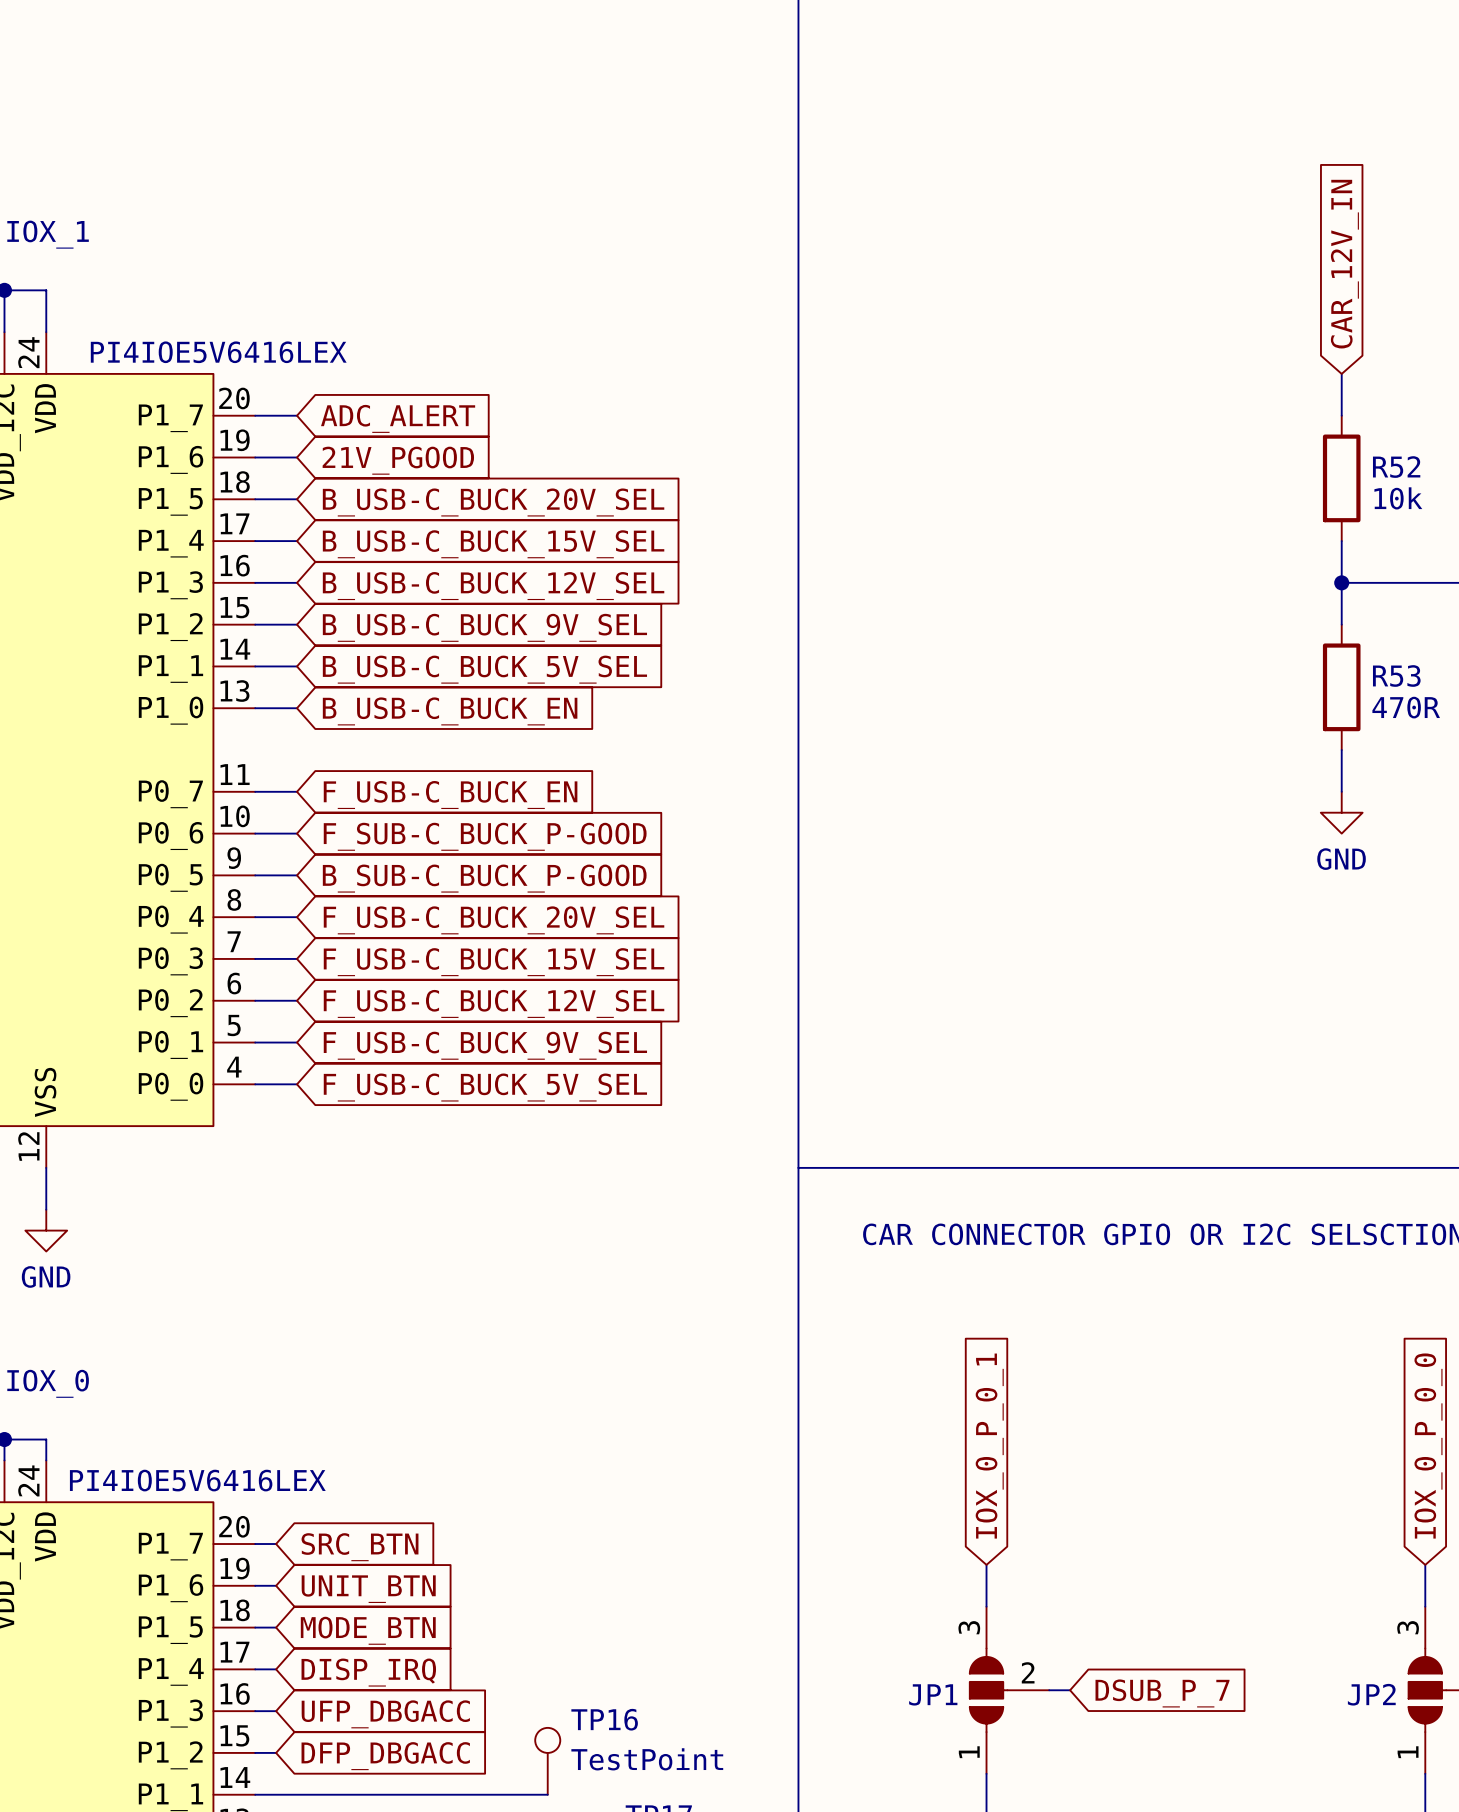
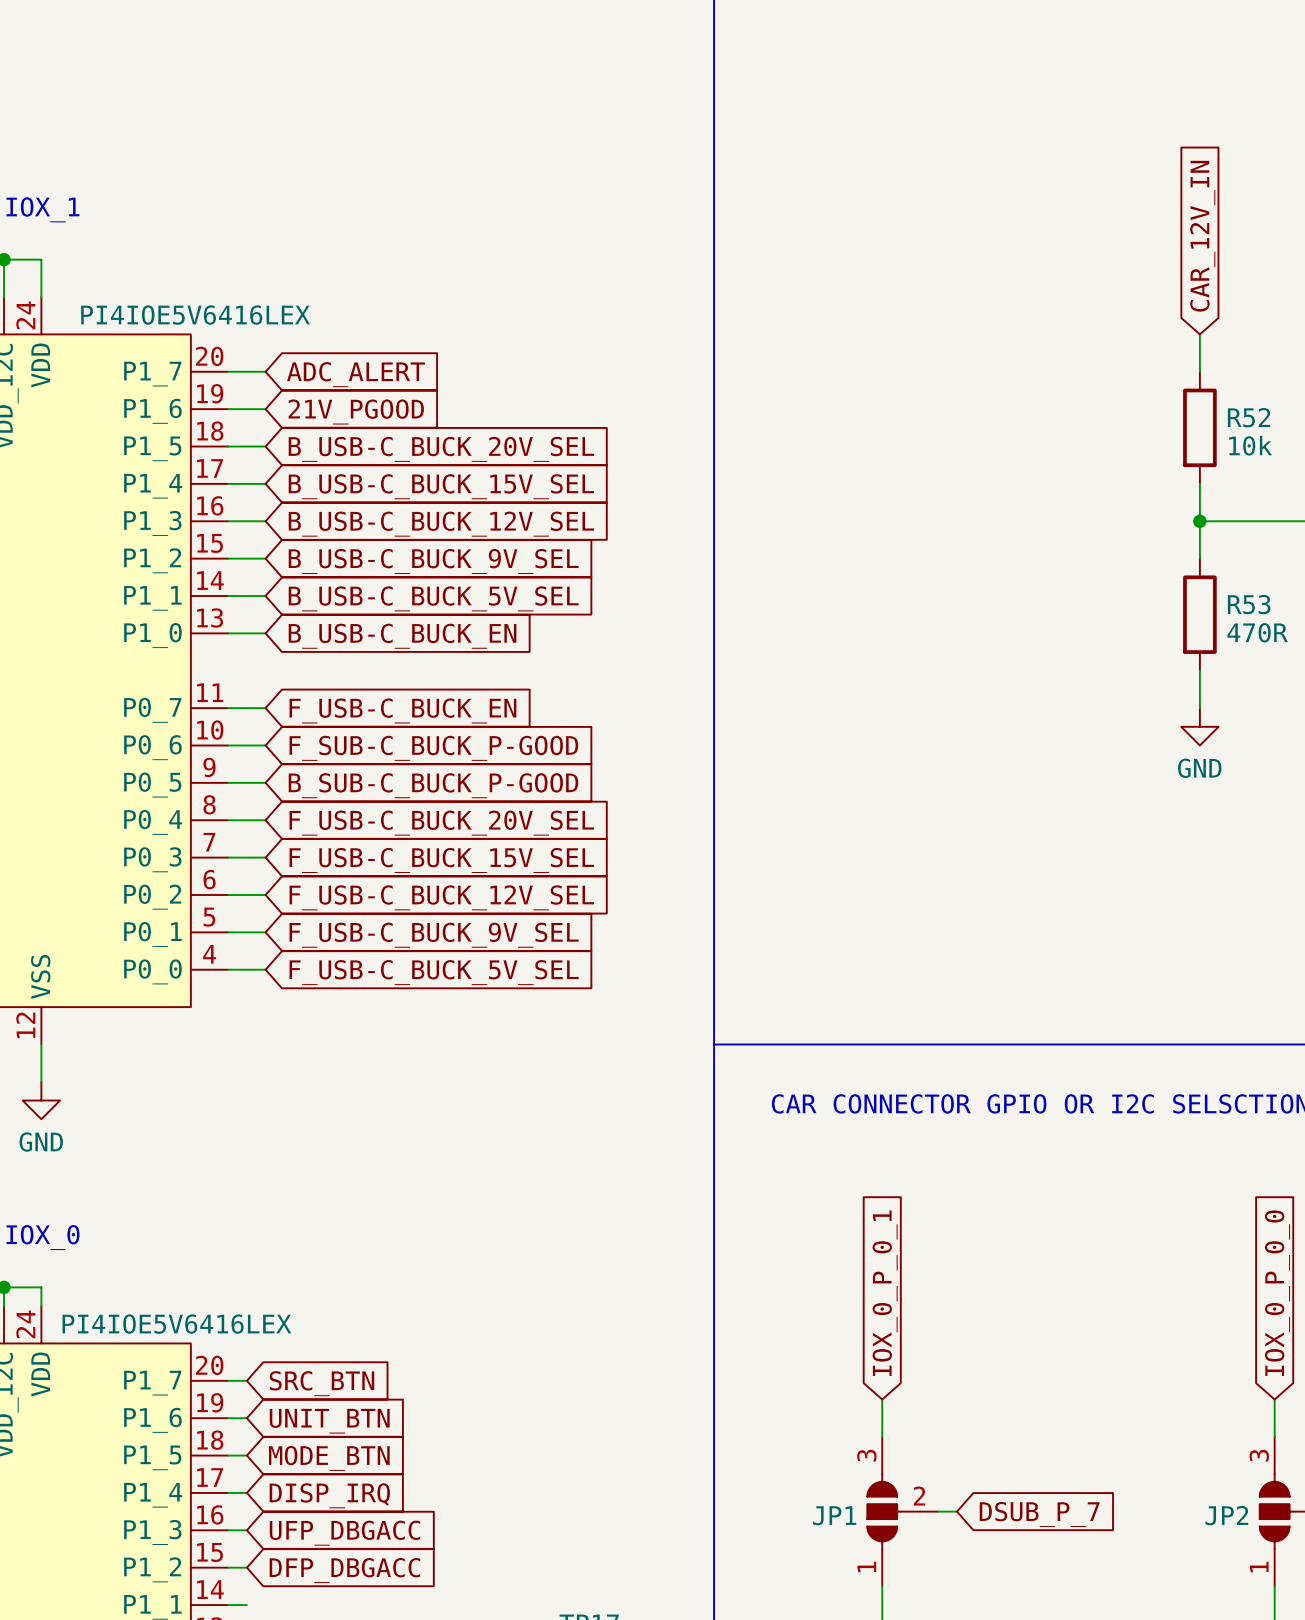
TP16: TestPoint (547, 1761) -> none
wire: (276, 1794) (547, 1794) -> none

